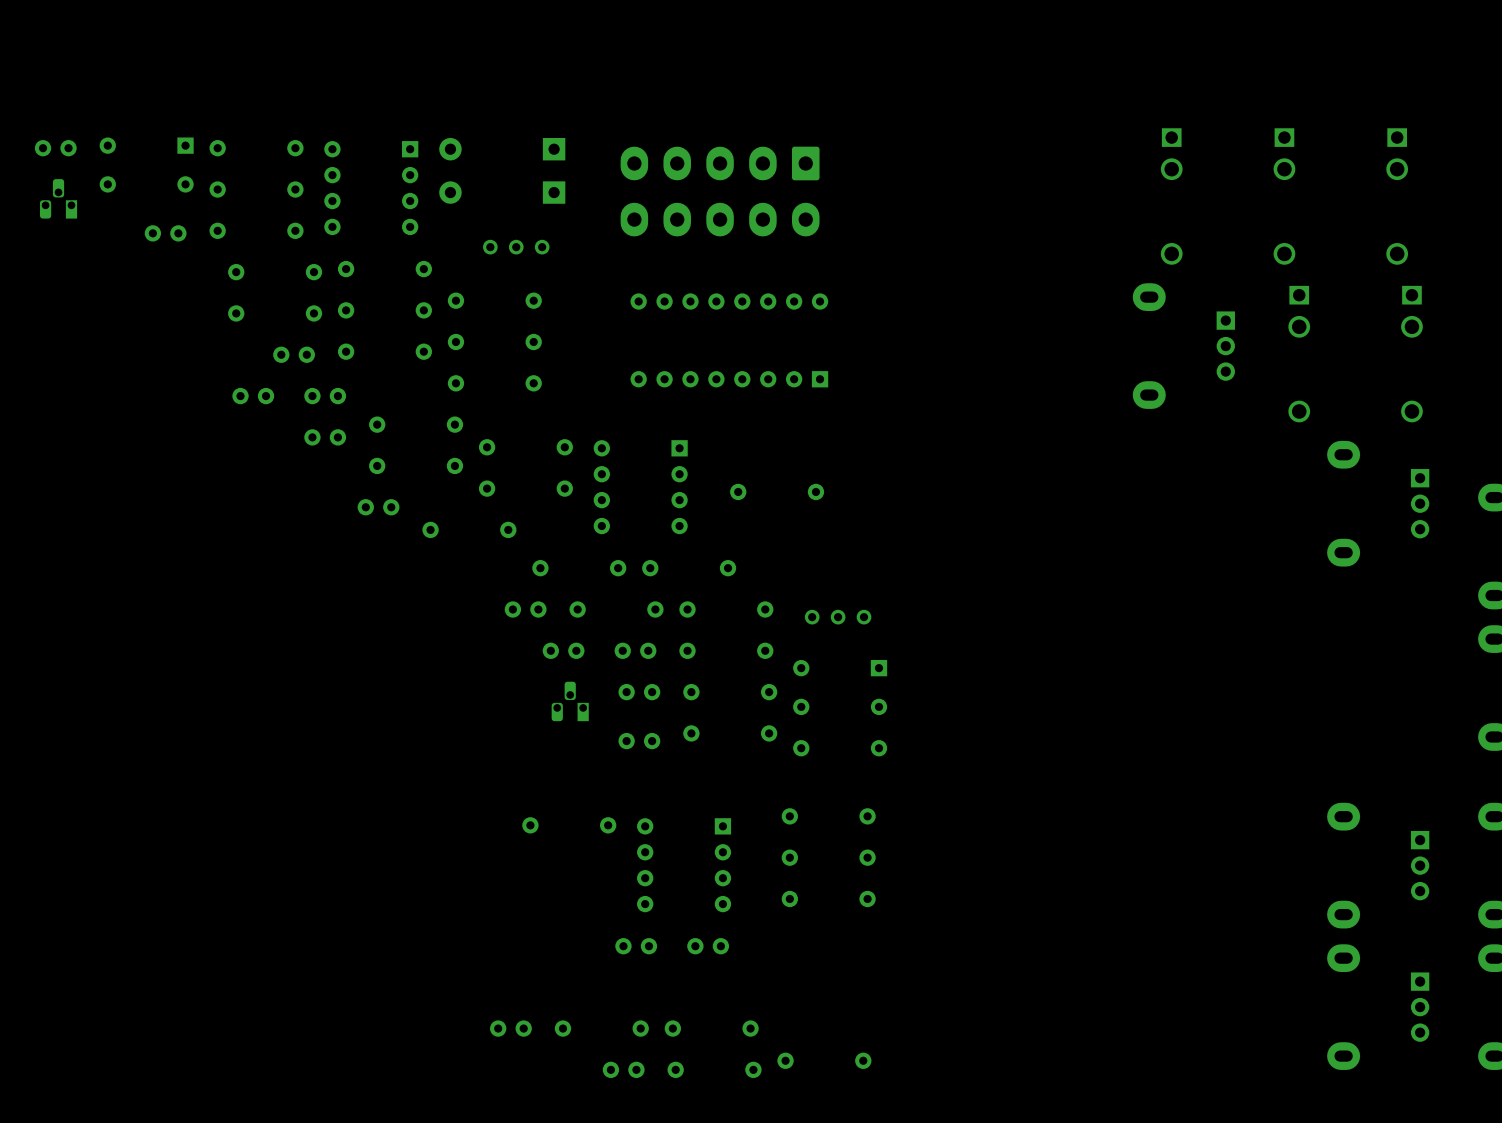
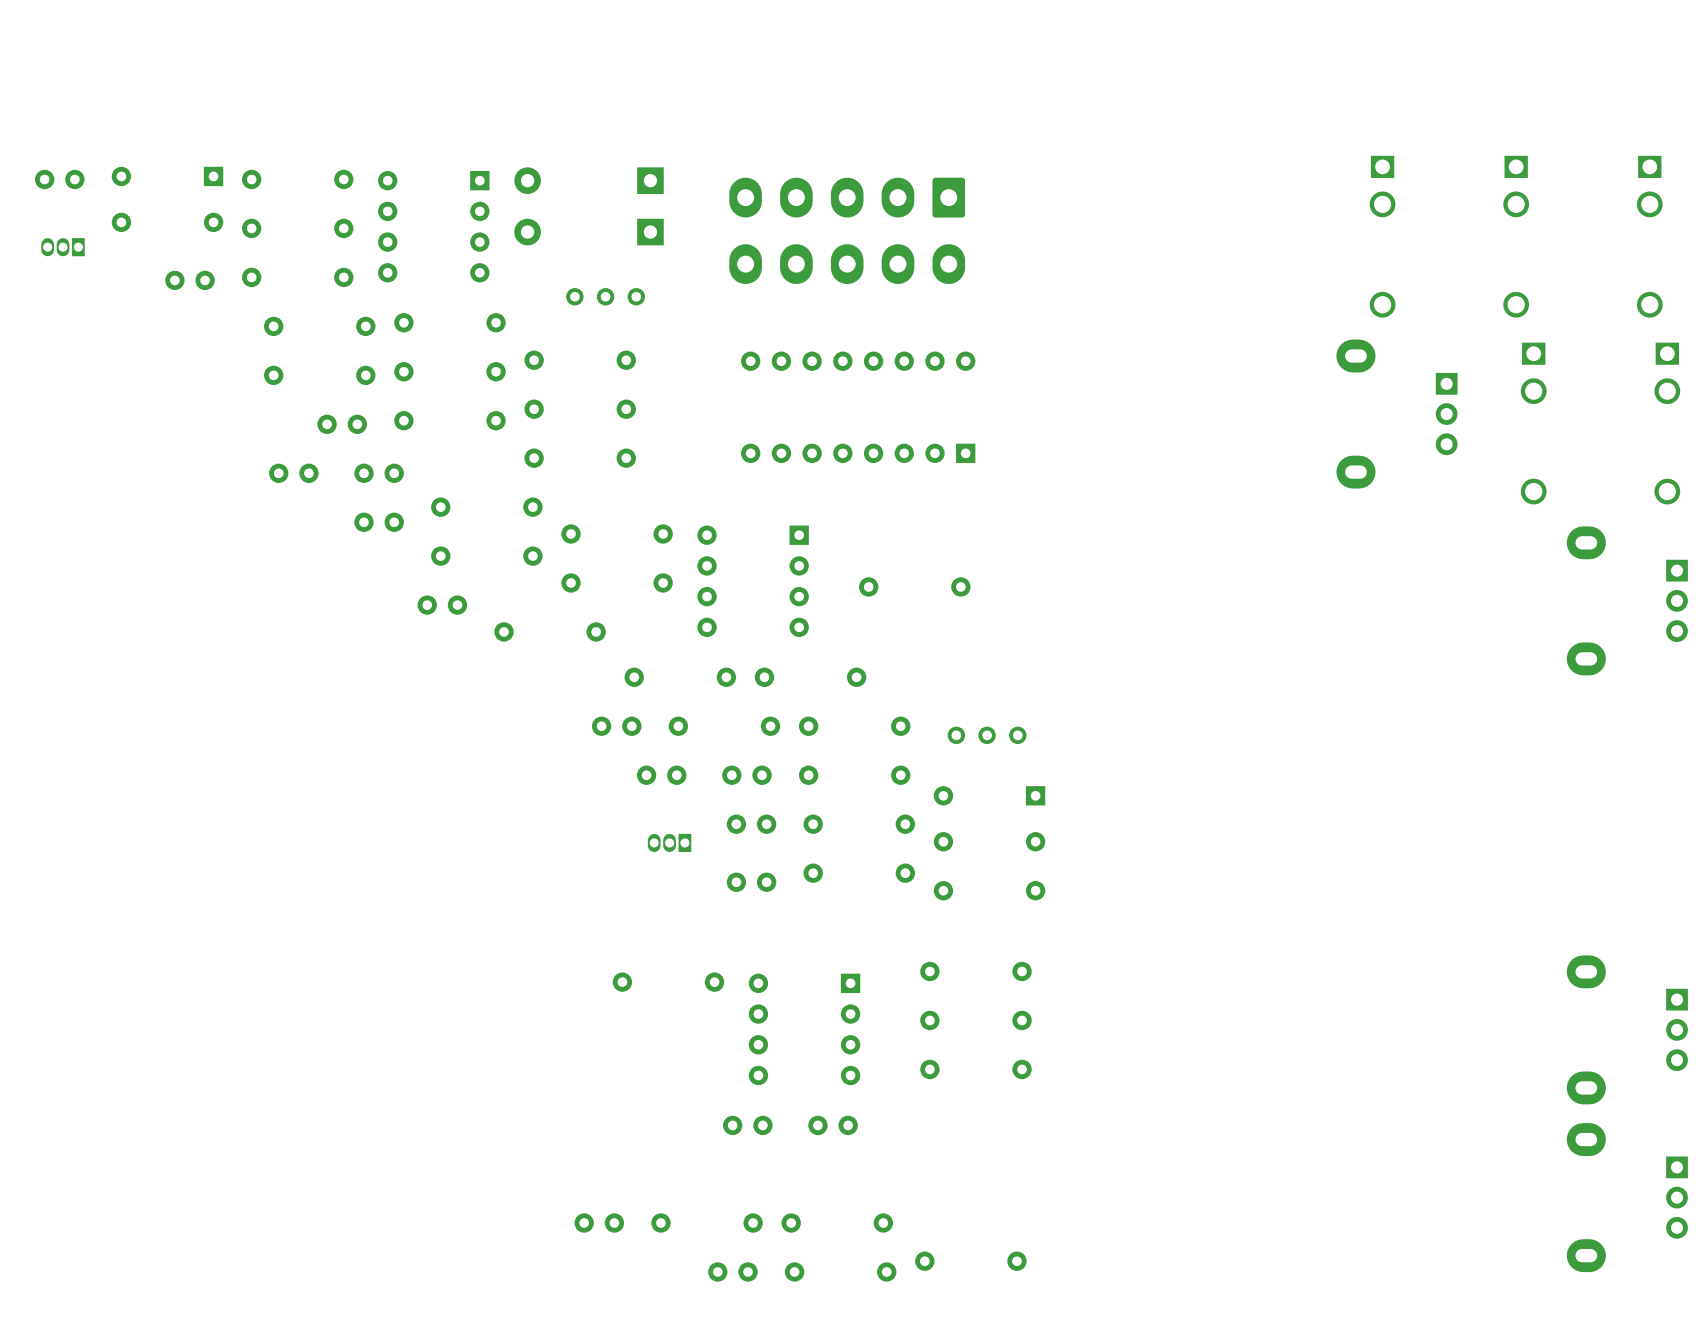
part footprint: [39, 179, 78, 219] -> [41, 238, 85, 257]
part footprint: [551, 681, 589, 722] -> [647, 833, 692, 853]

